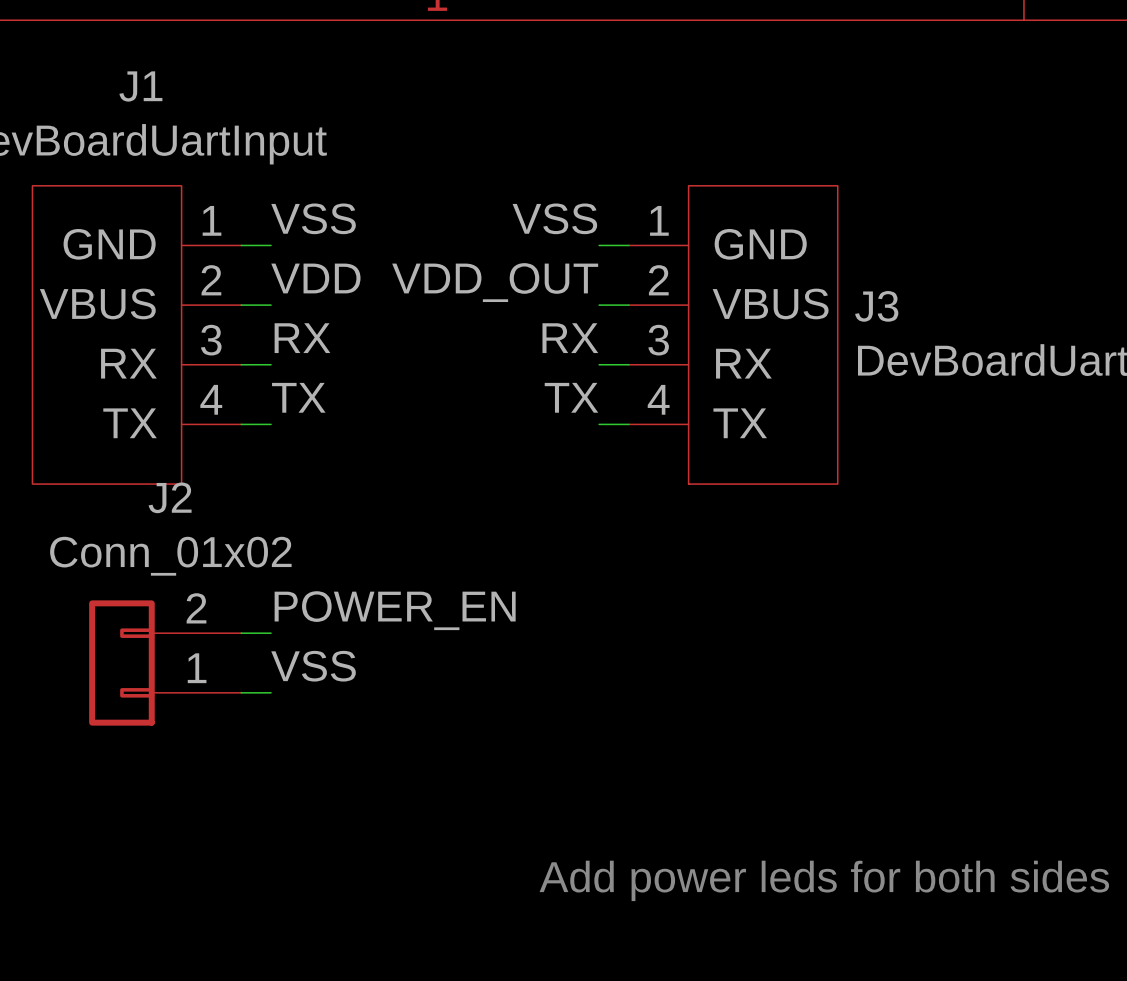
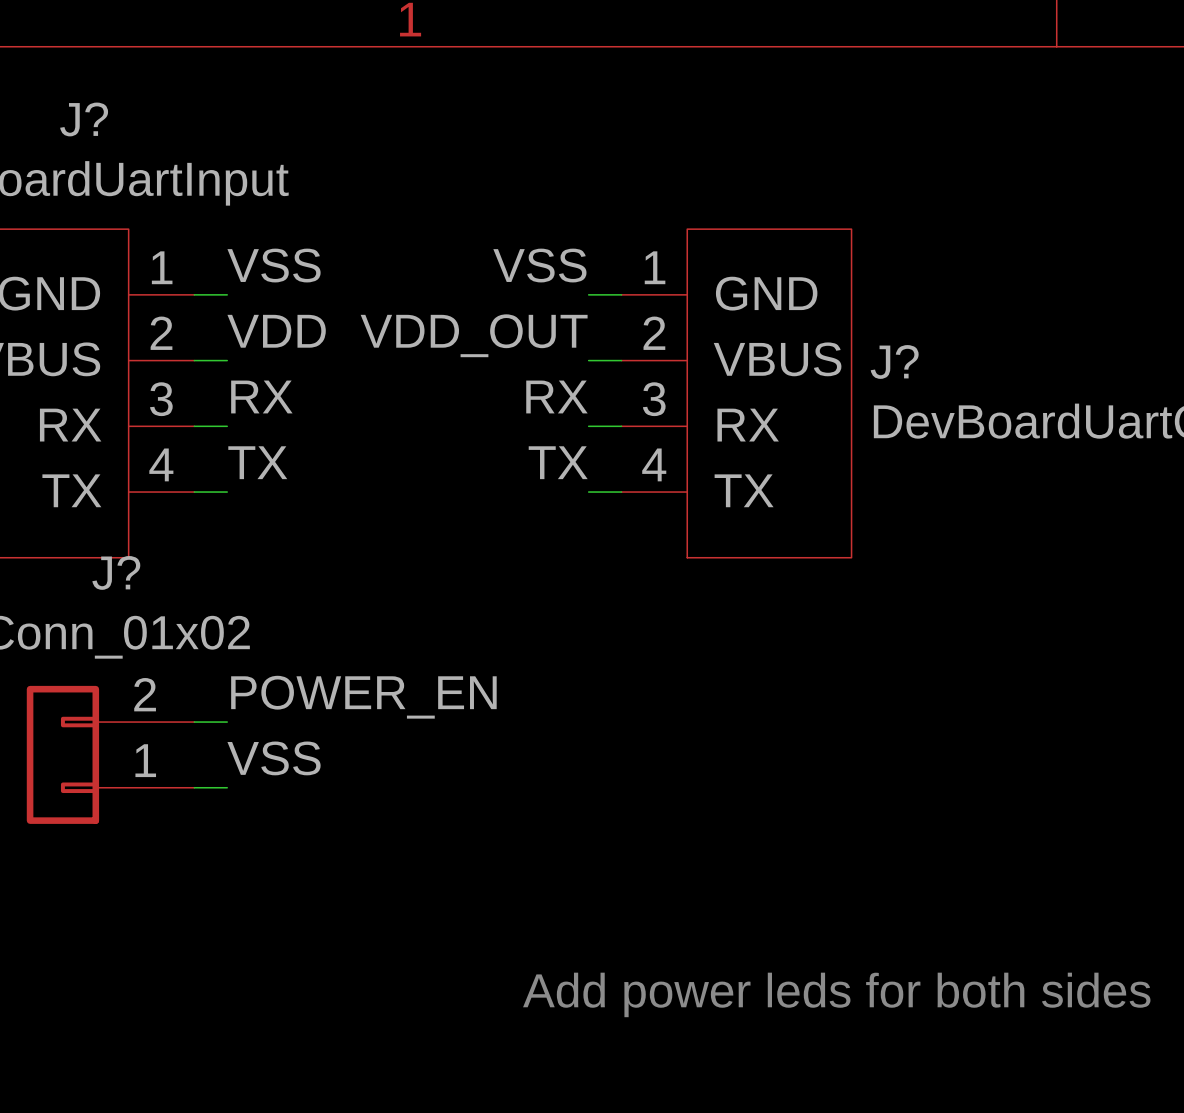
J1 name: J1 (140, 86) -> J? (84, 119)
J3 name: J3 (876, 306) -> J? (894, 361)
J2 name: J2 (170, 497) -> J? (116, 572)

